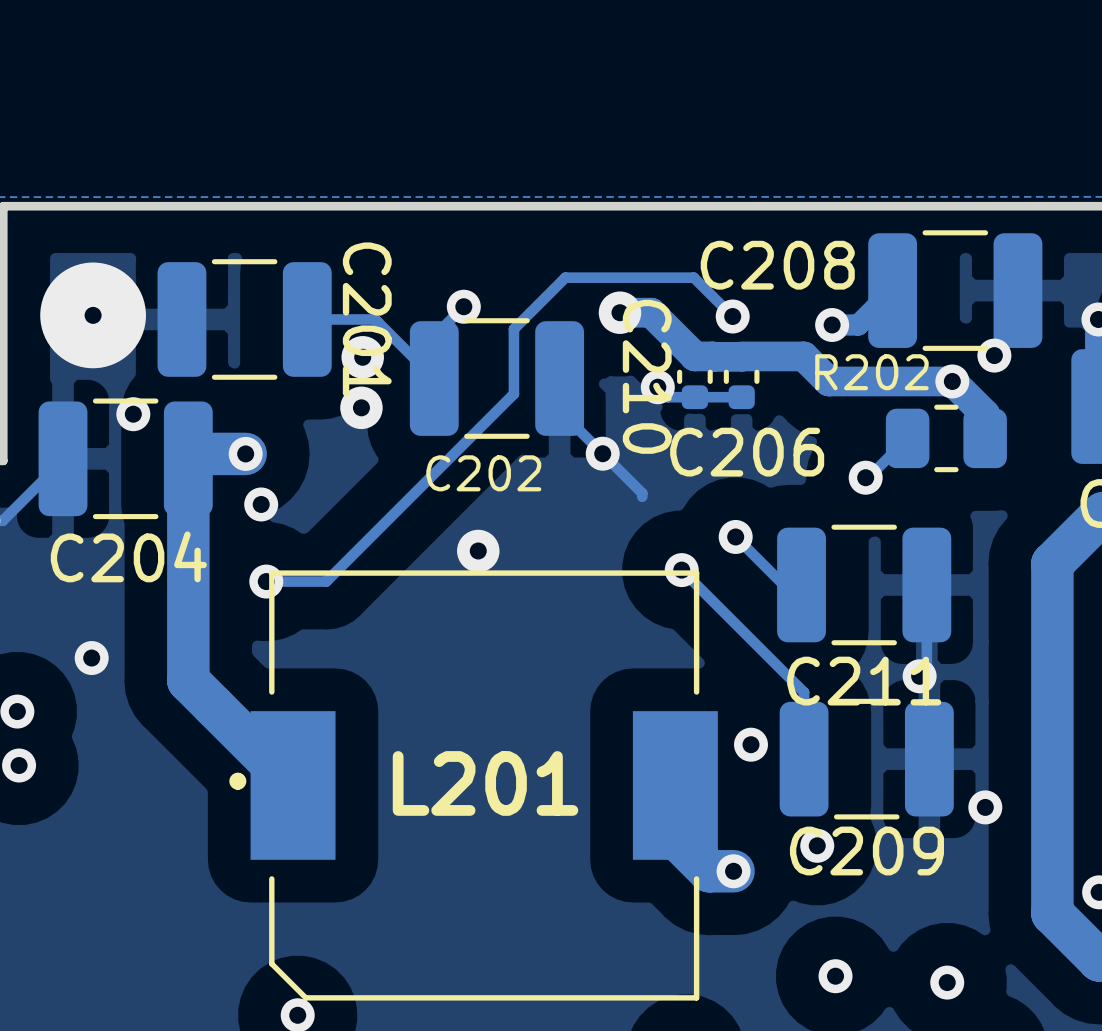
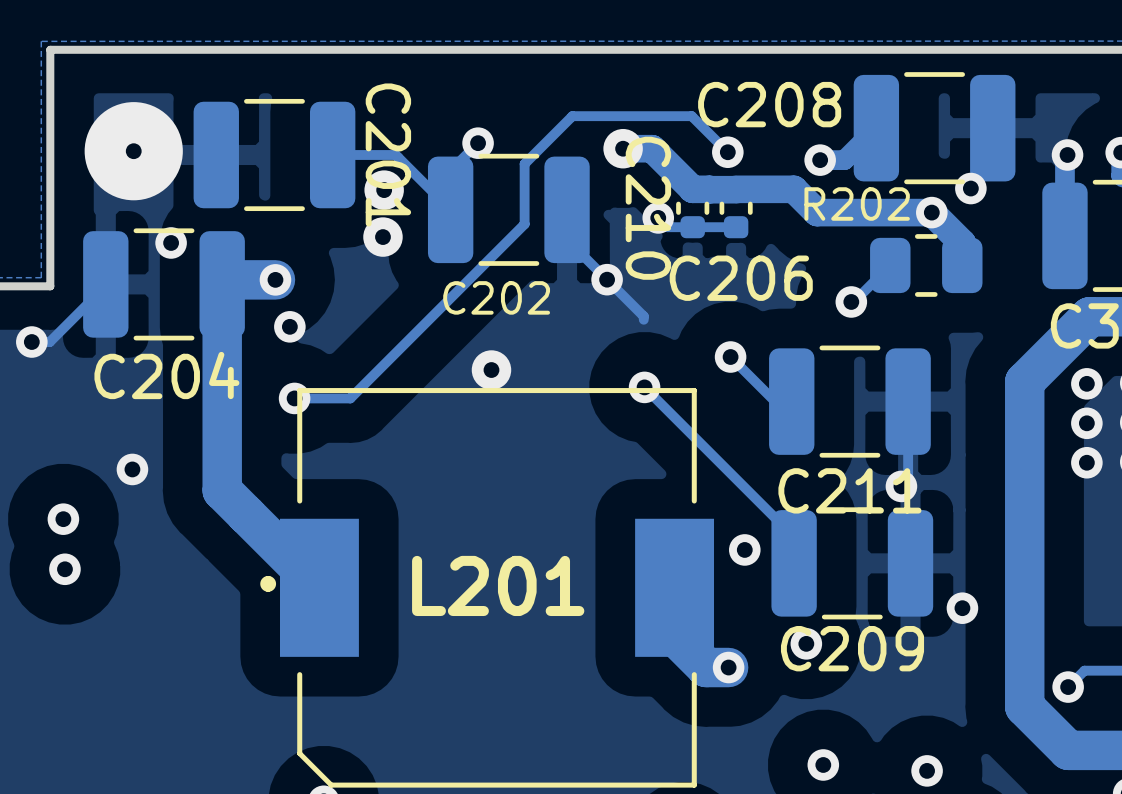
track: (681, 570) (804, 692) (804, 730) -> (644, 387) (794, 536)
via position: (681, 570) -> (644, 387)

